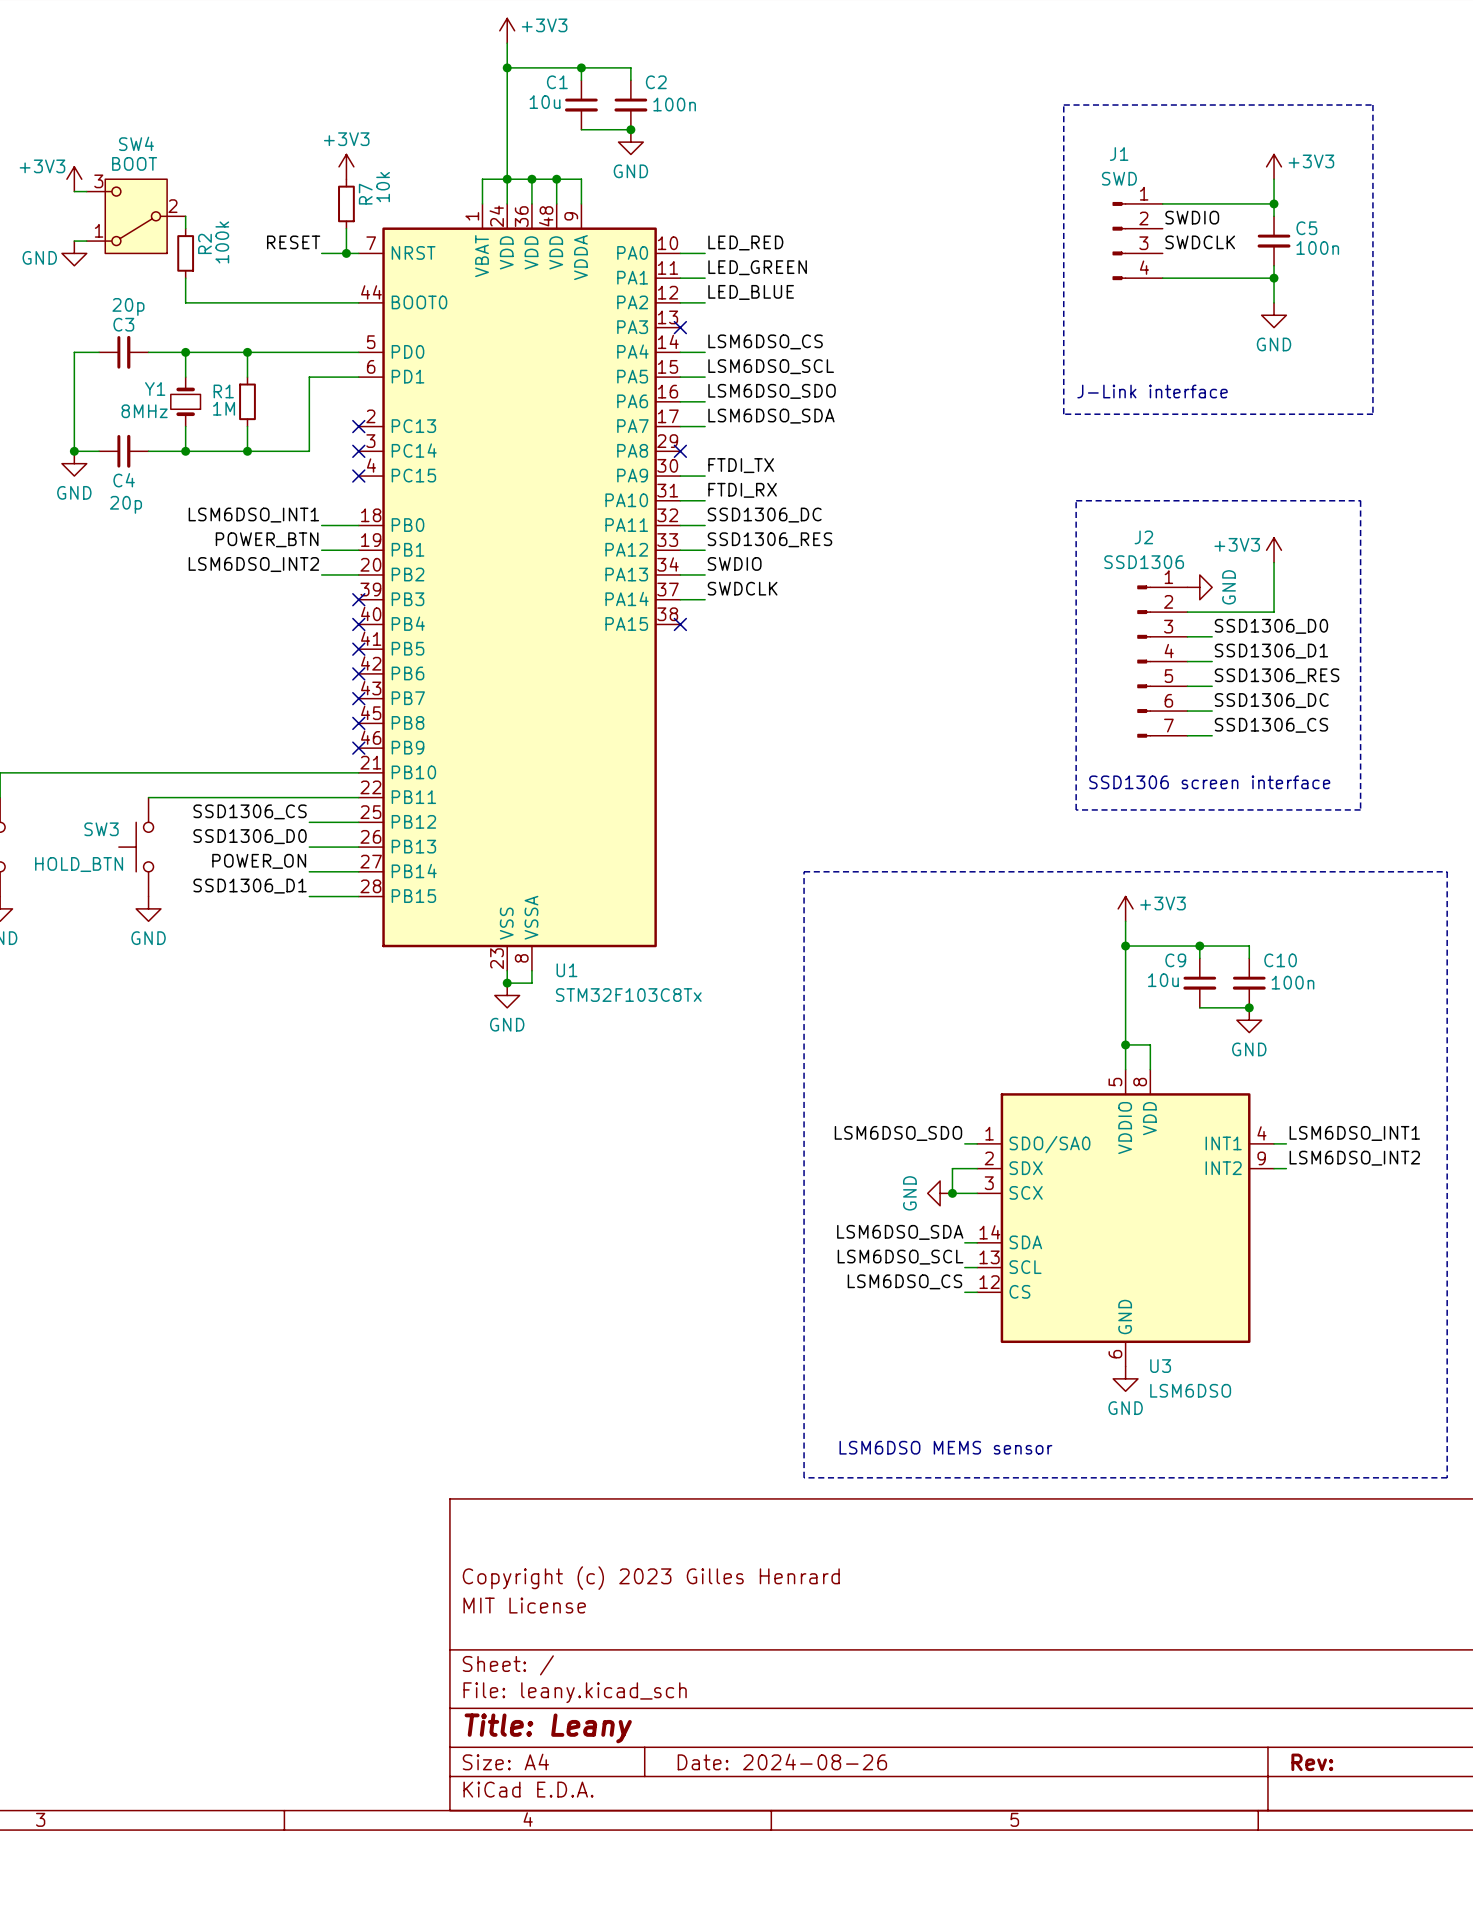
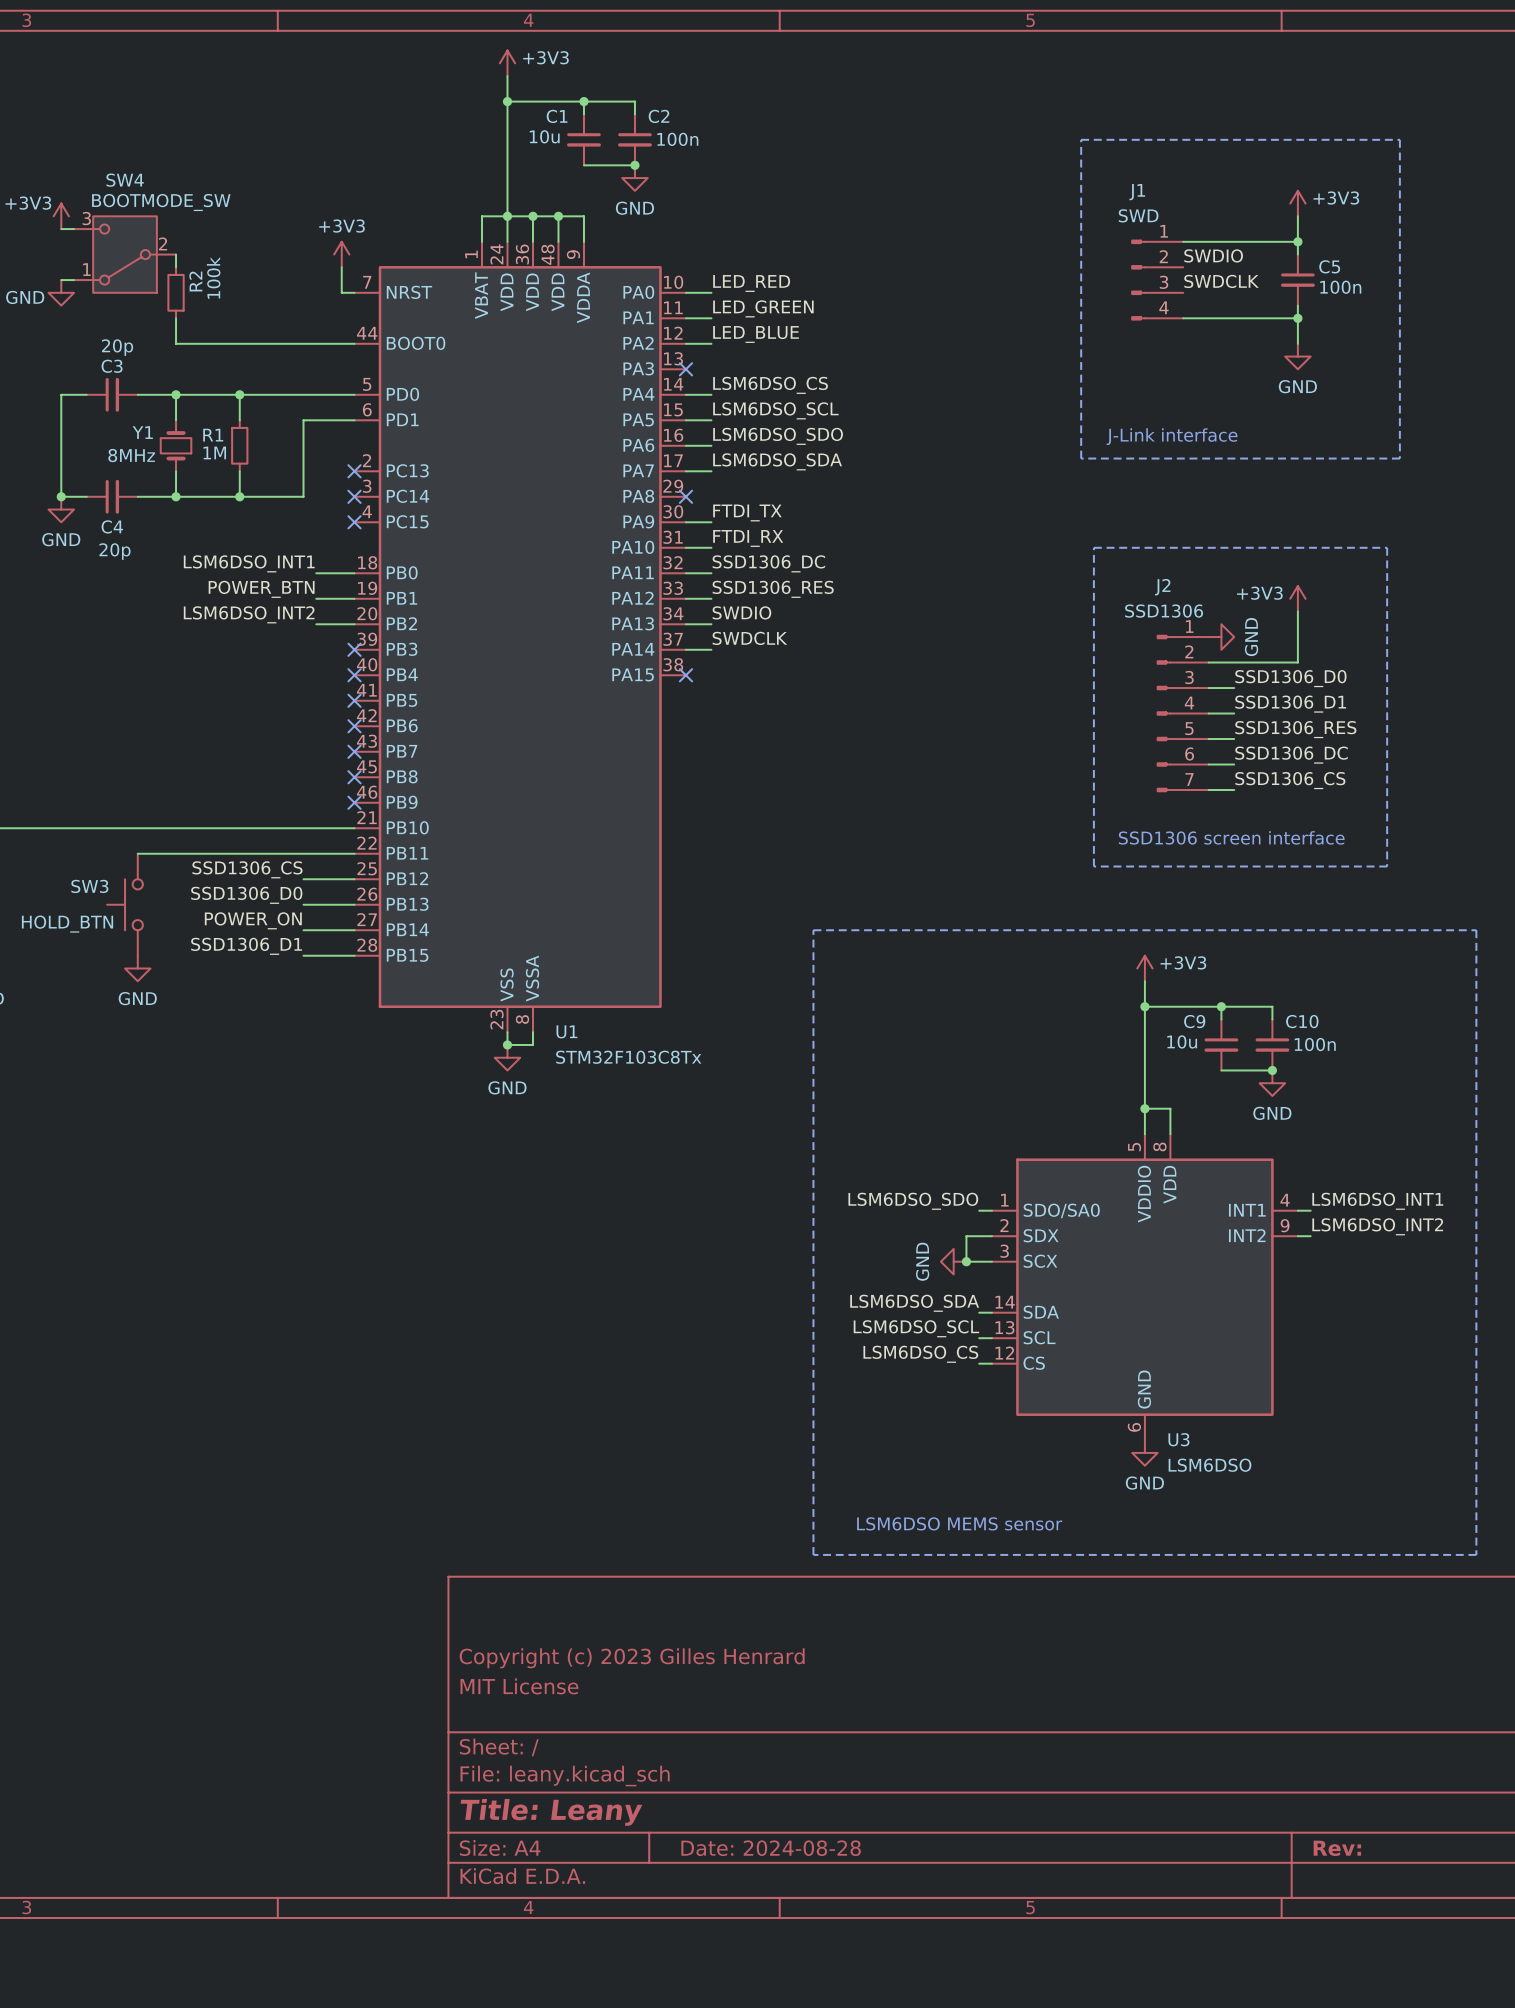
SW4 value: BOOT (134, 163) -> BOOTMODE_SW (161, 202)
power symbol position: +3V3 (346, 166) -> +3V3 (341, 254)
R7: 10k (346, 203) -> none
label: RESET (293, 242) -> none
wire: (321, 253) (346, 253) -> none
junction: (346, 253) -> none
title block: Date: 2024-08-26 (782, 1761) -> Date: 2024-08-28 (771, 1848)

